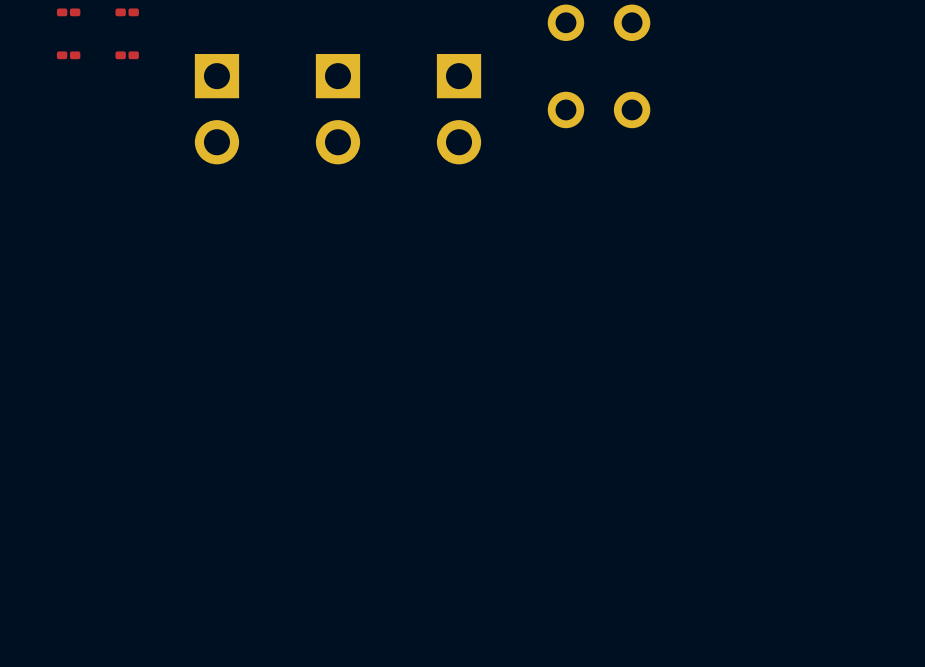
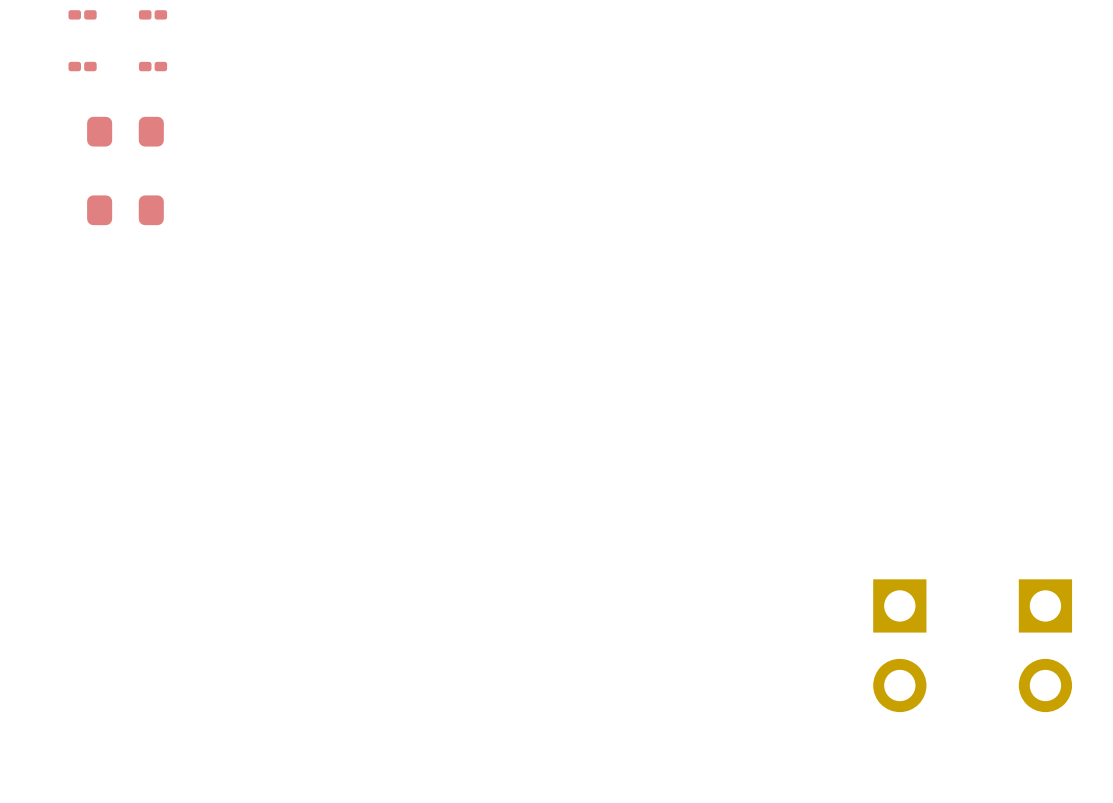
part: (599, 22) -> none
part: none -> (125, 131)
part: (216, 109) -> none
part: (337, 109) -> none
part: (459, 109) -> none
part: (599, 109) -> none
part: none -> (125, 210)
part: none -> (899, 645)
part: none -> (1045, 645)

